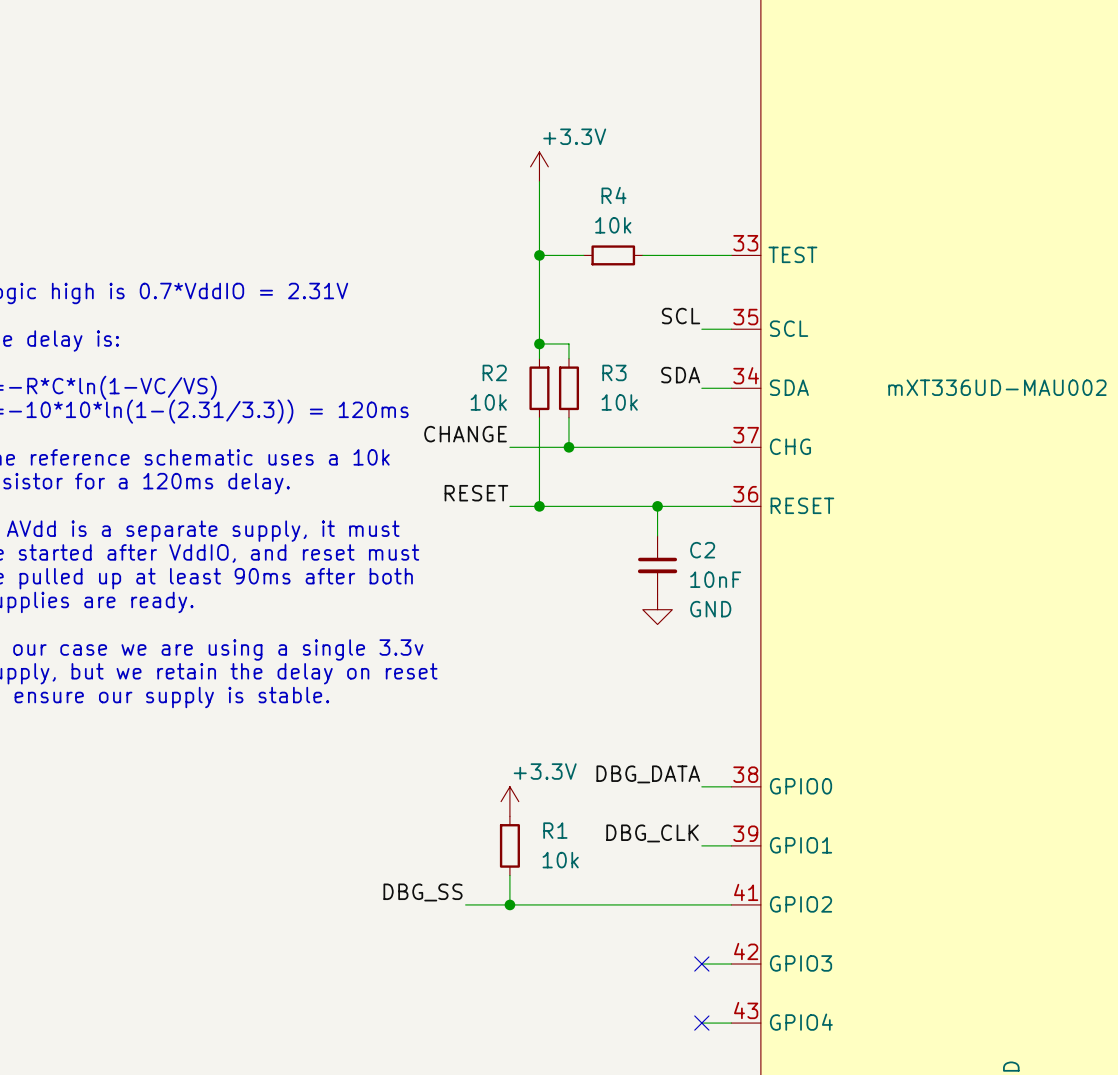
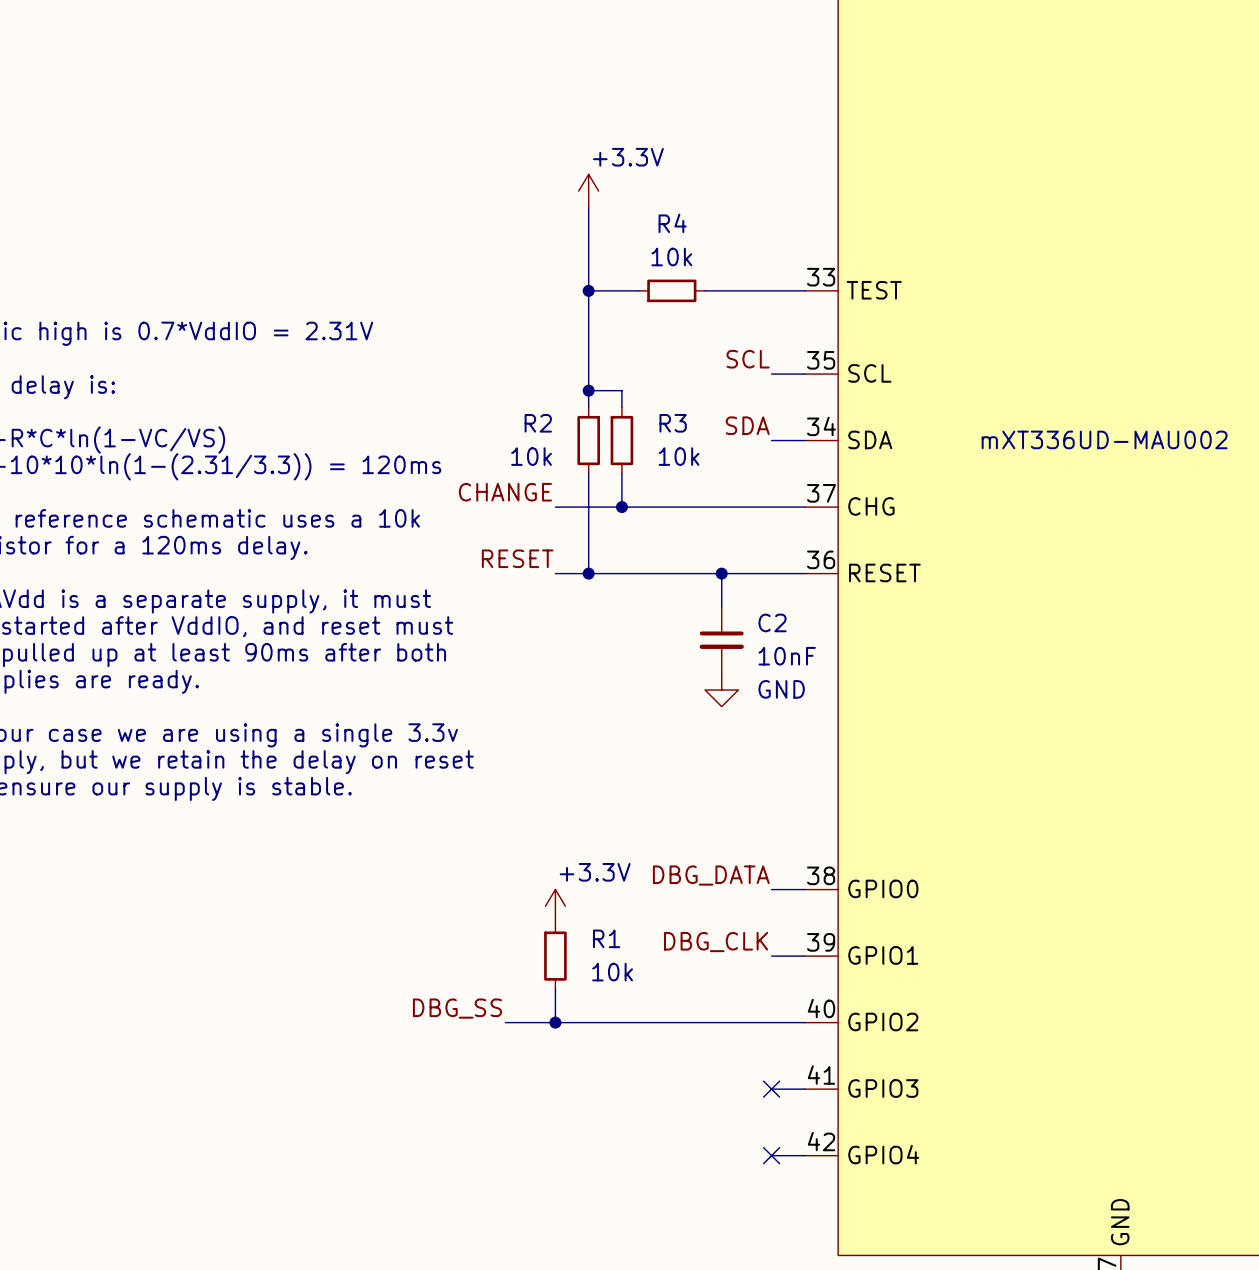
part pin number: 41 (746, 892) -> 40 (821, 1008)
part pin number: 42 (746, 951) -> 41 (821, 1075)
part pin number: 43 (746, 1010) -> 42 (821, 1141)

